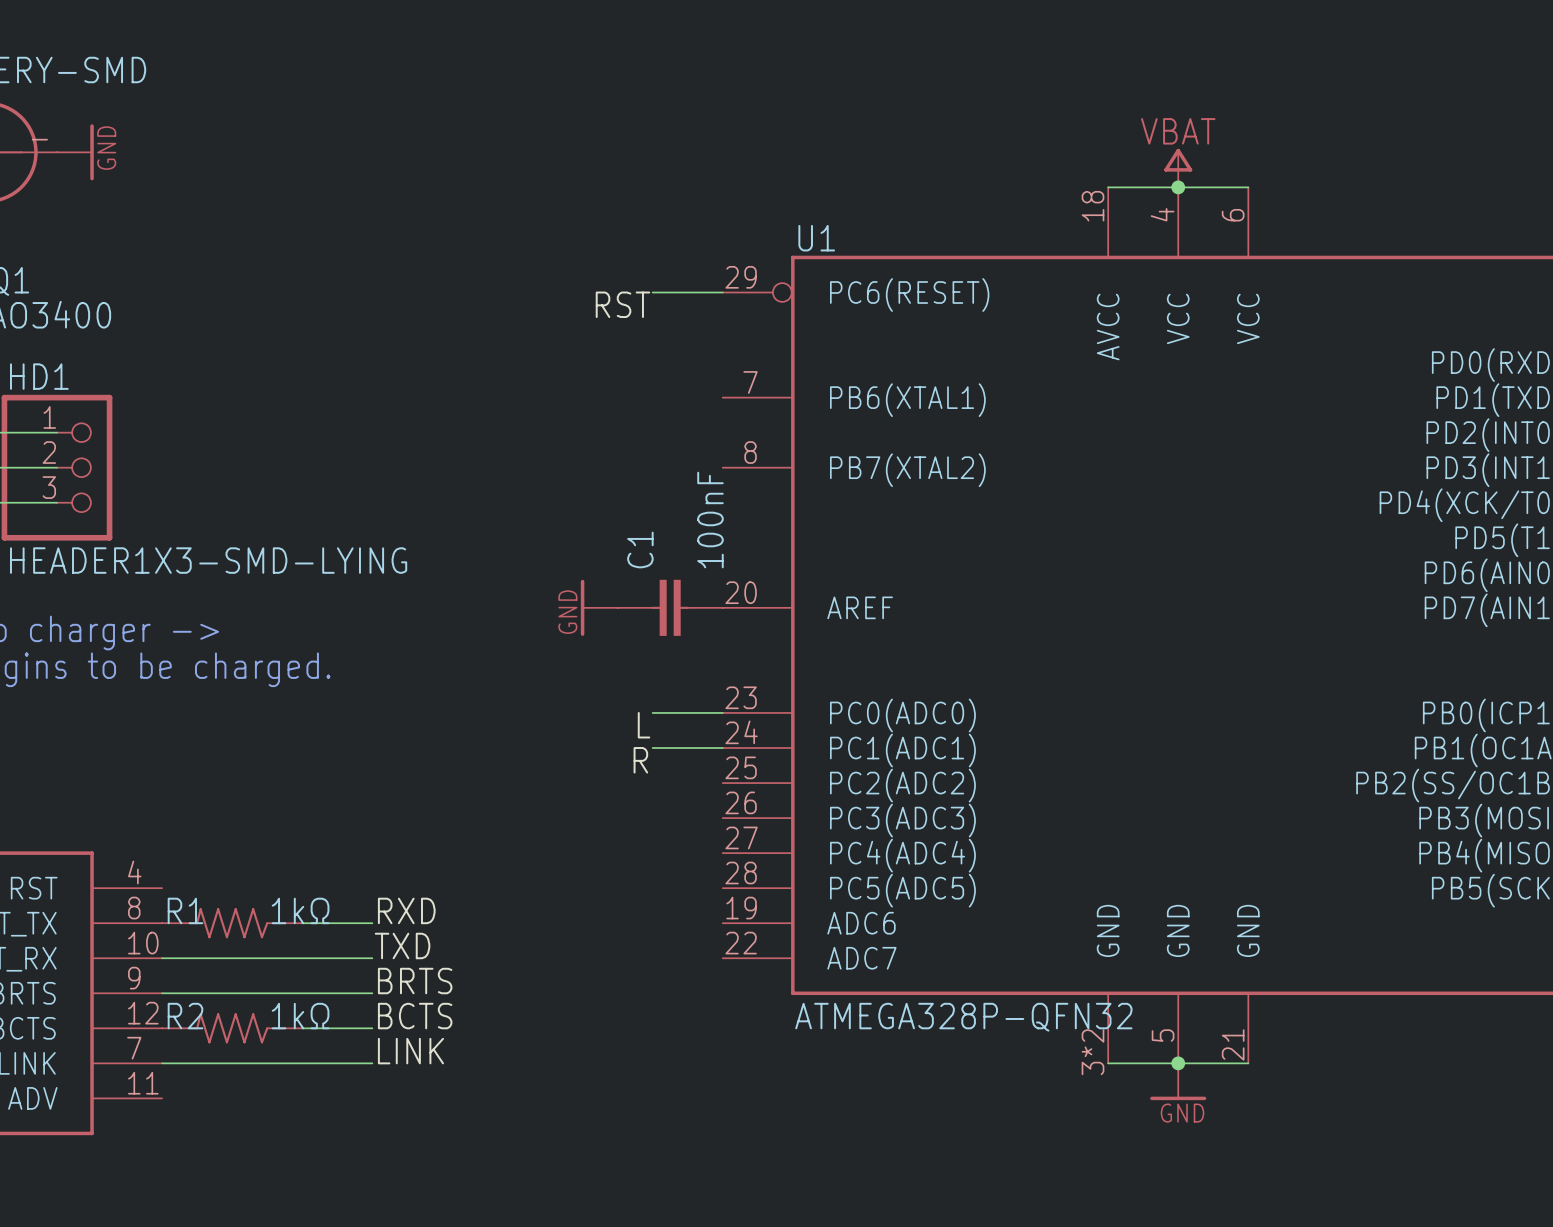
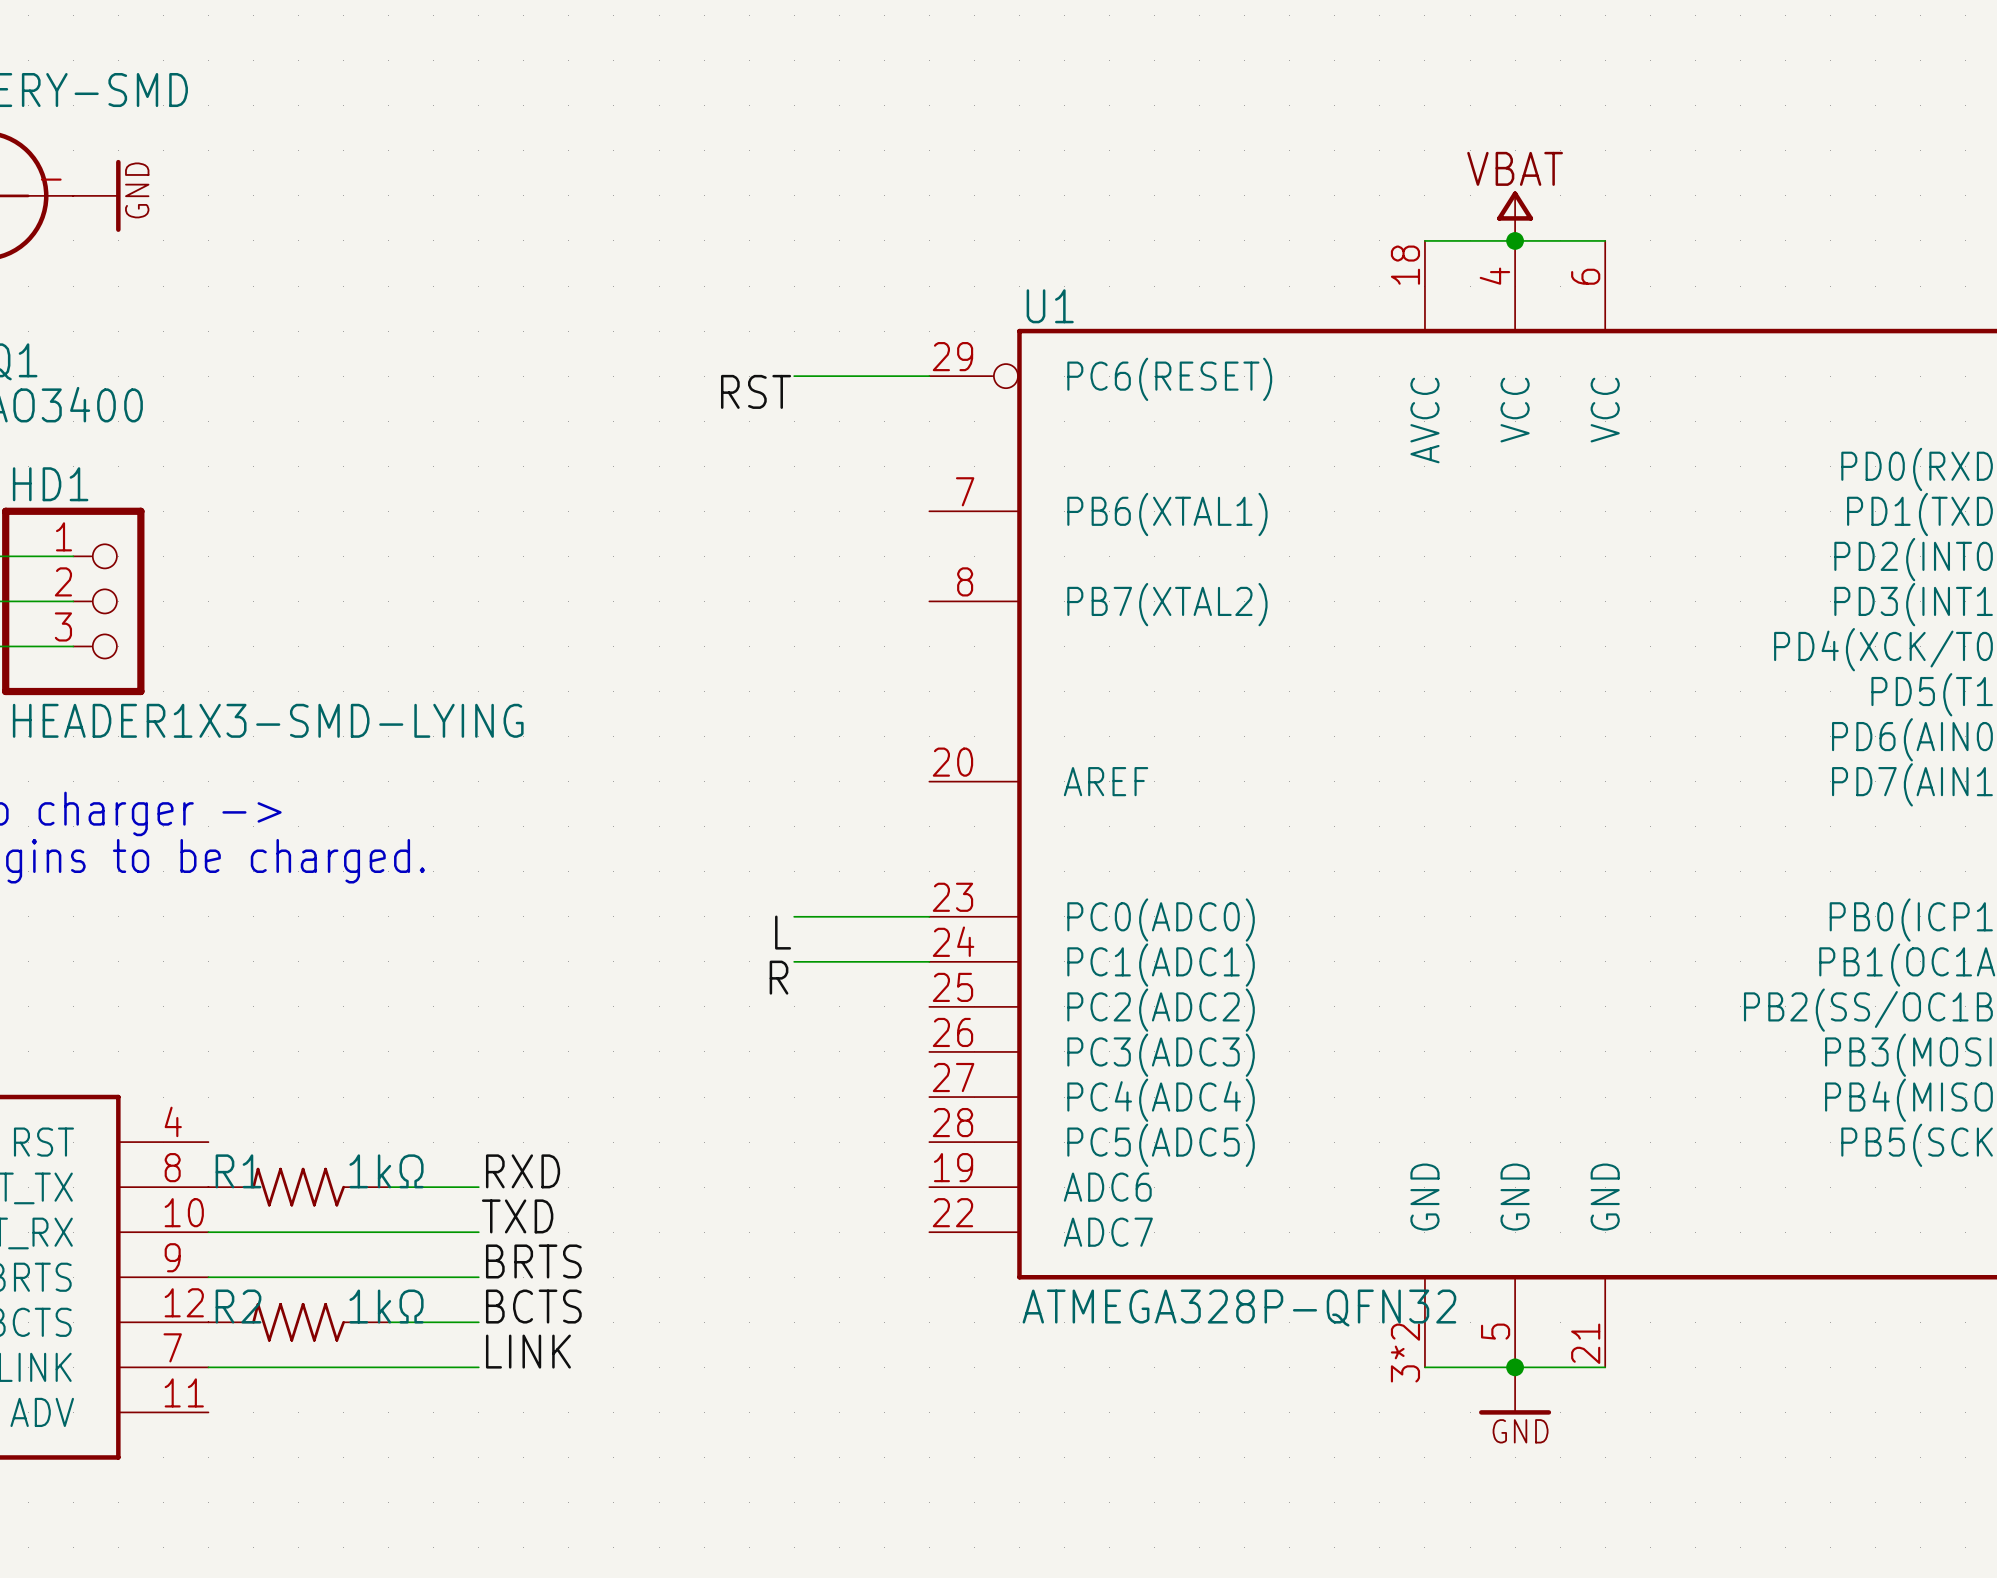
label position: RST (622, 304) -> RST (756, 391)
power symbol: (599, 607) -> none
C1: 100nF (670, 607) -> none
wire: none -> (794, 916) (839, 916)
label position: L (644, 725) -> L (783, 932)
wire: none -> (794, 961) (839, 961)
label position: R (640, 760) -> R (779, 977)

